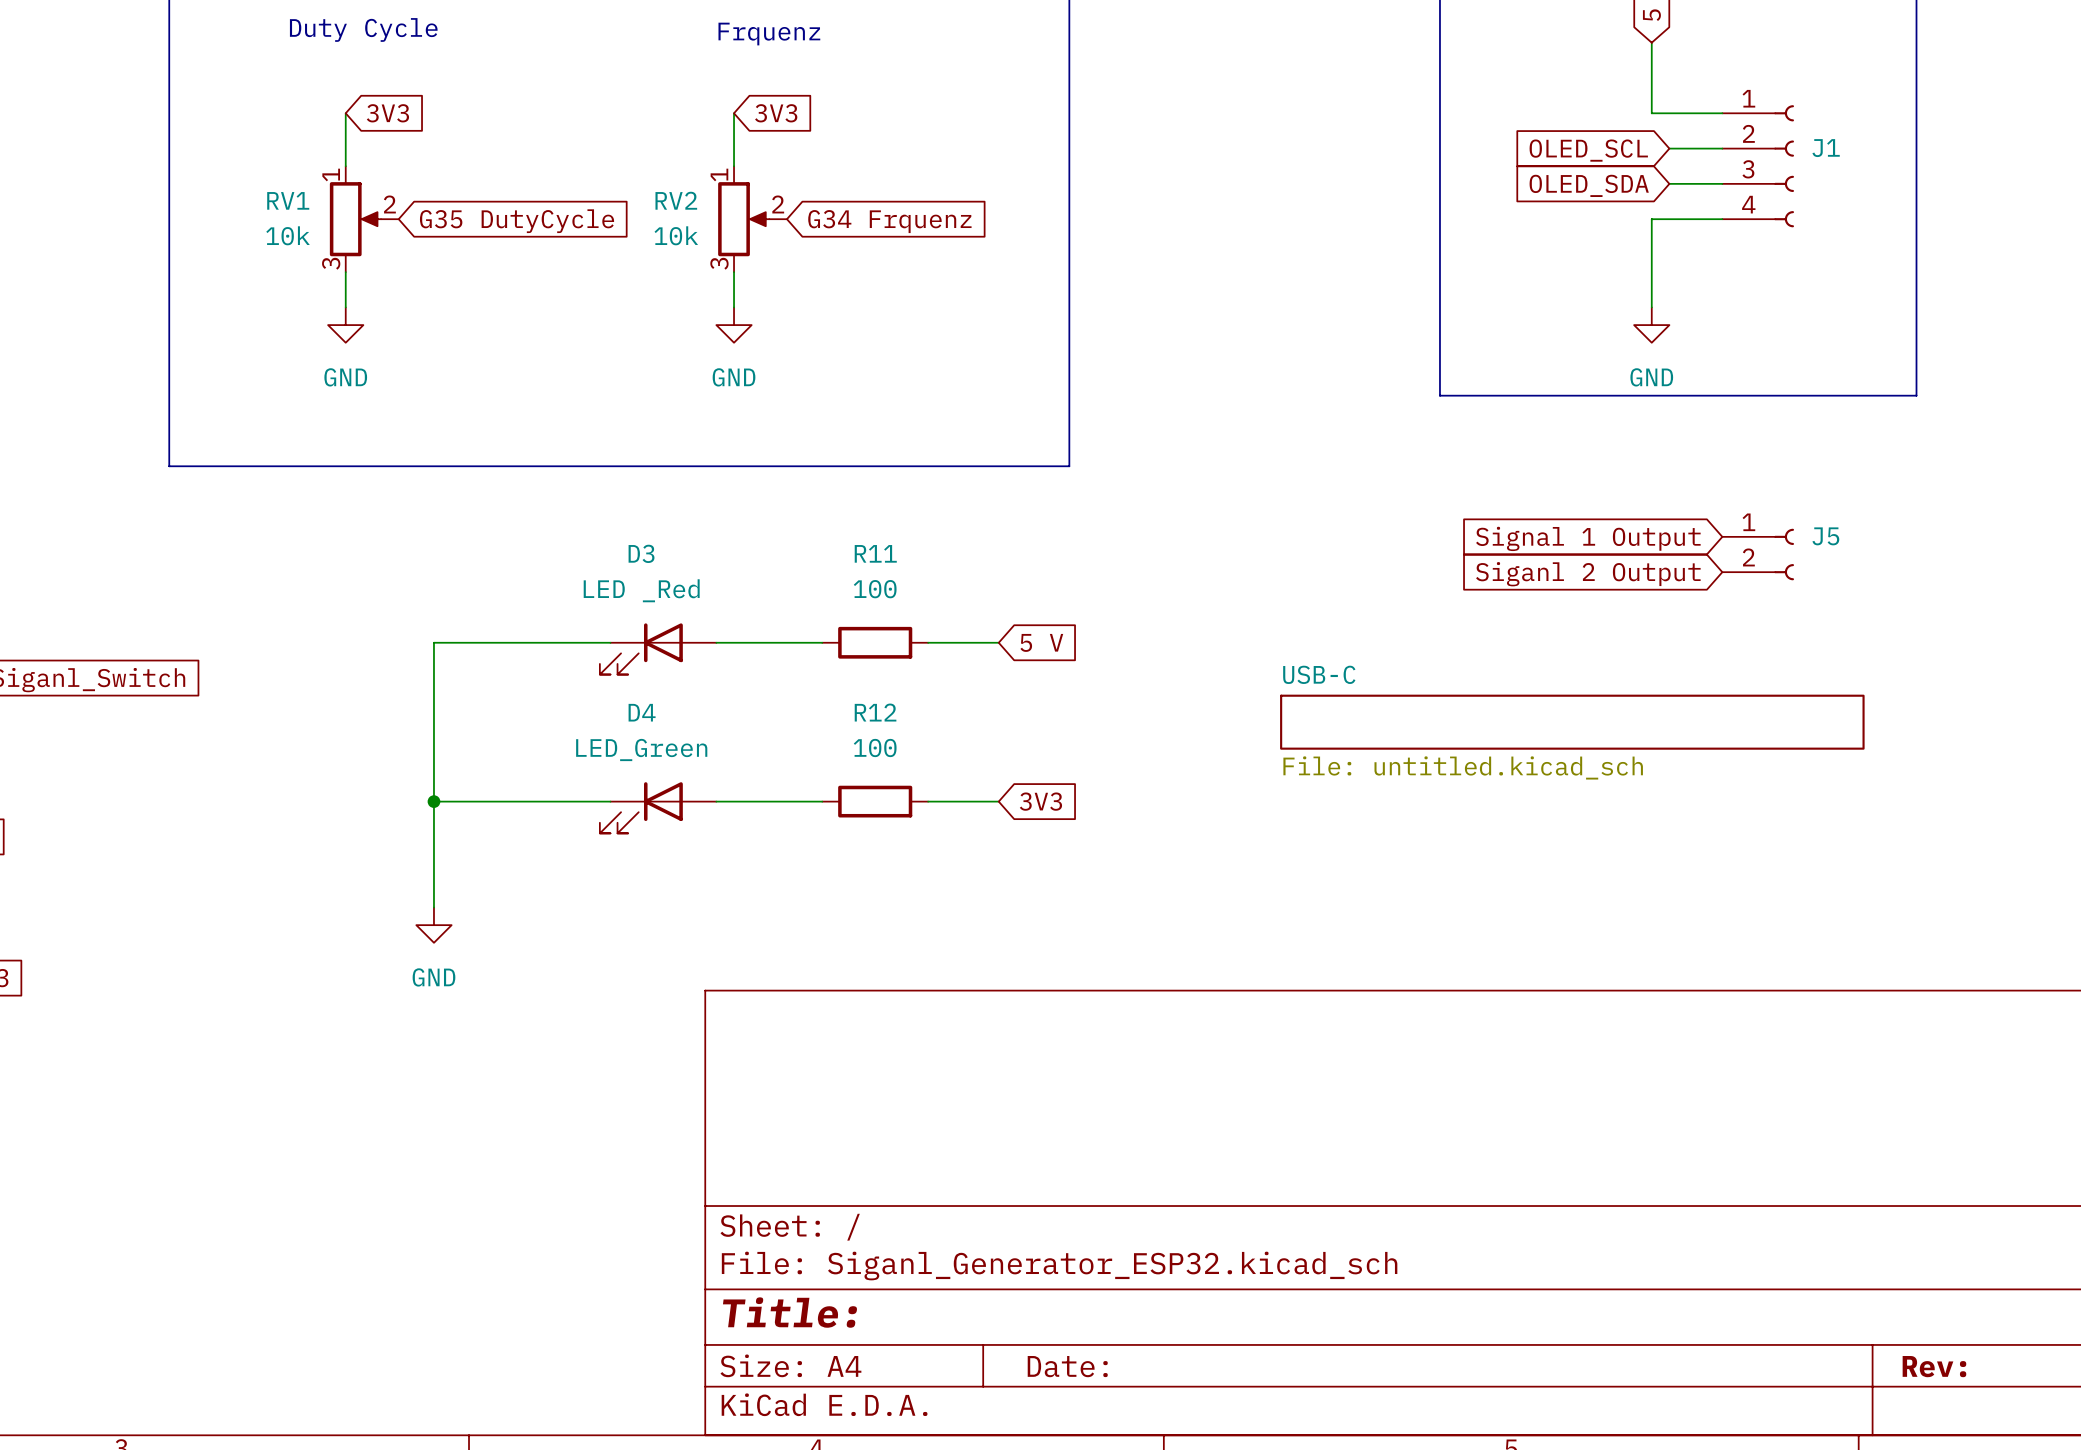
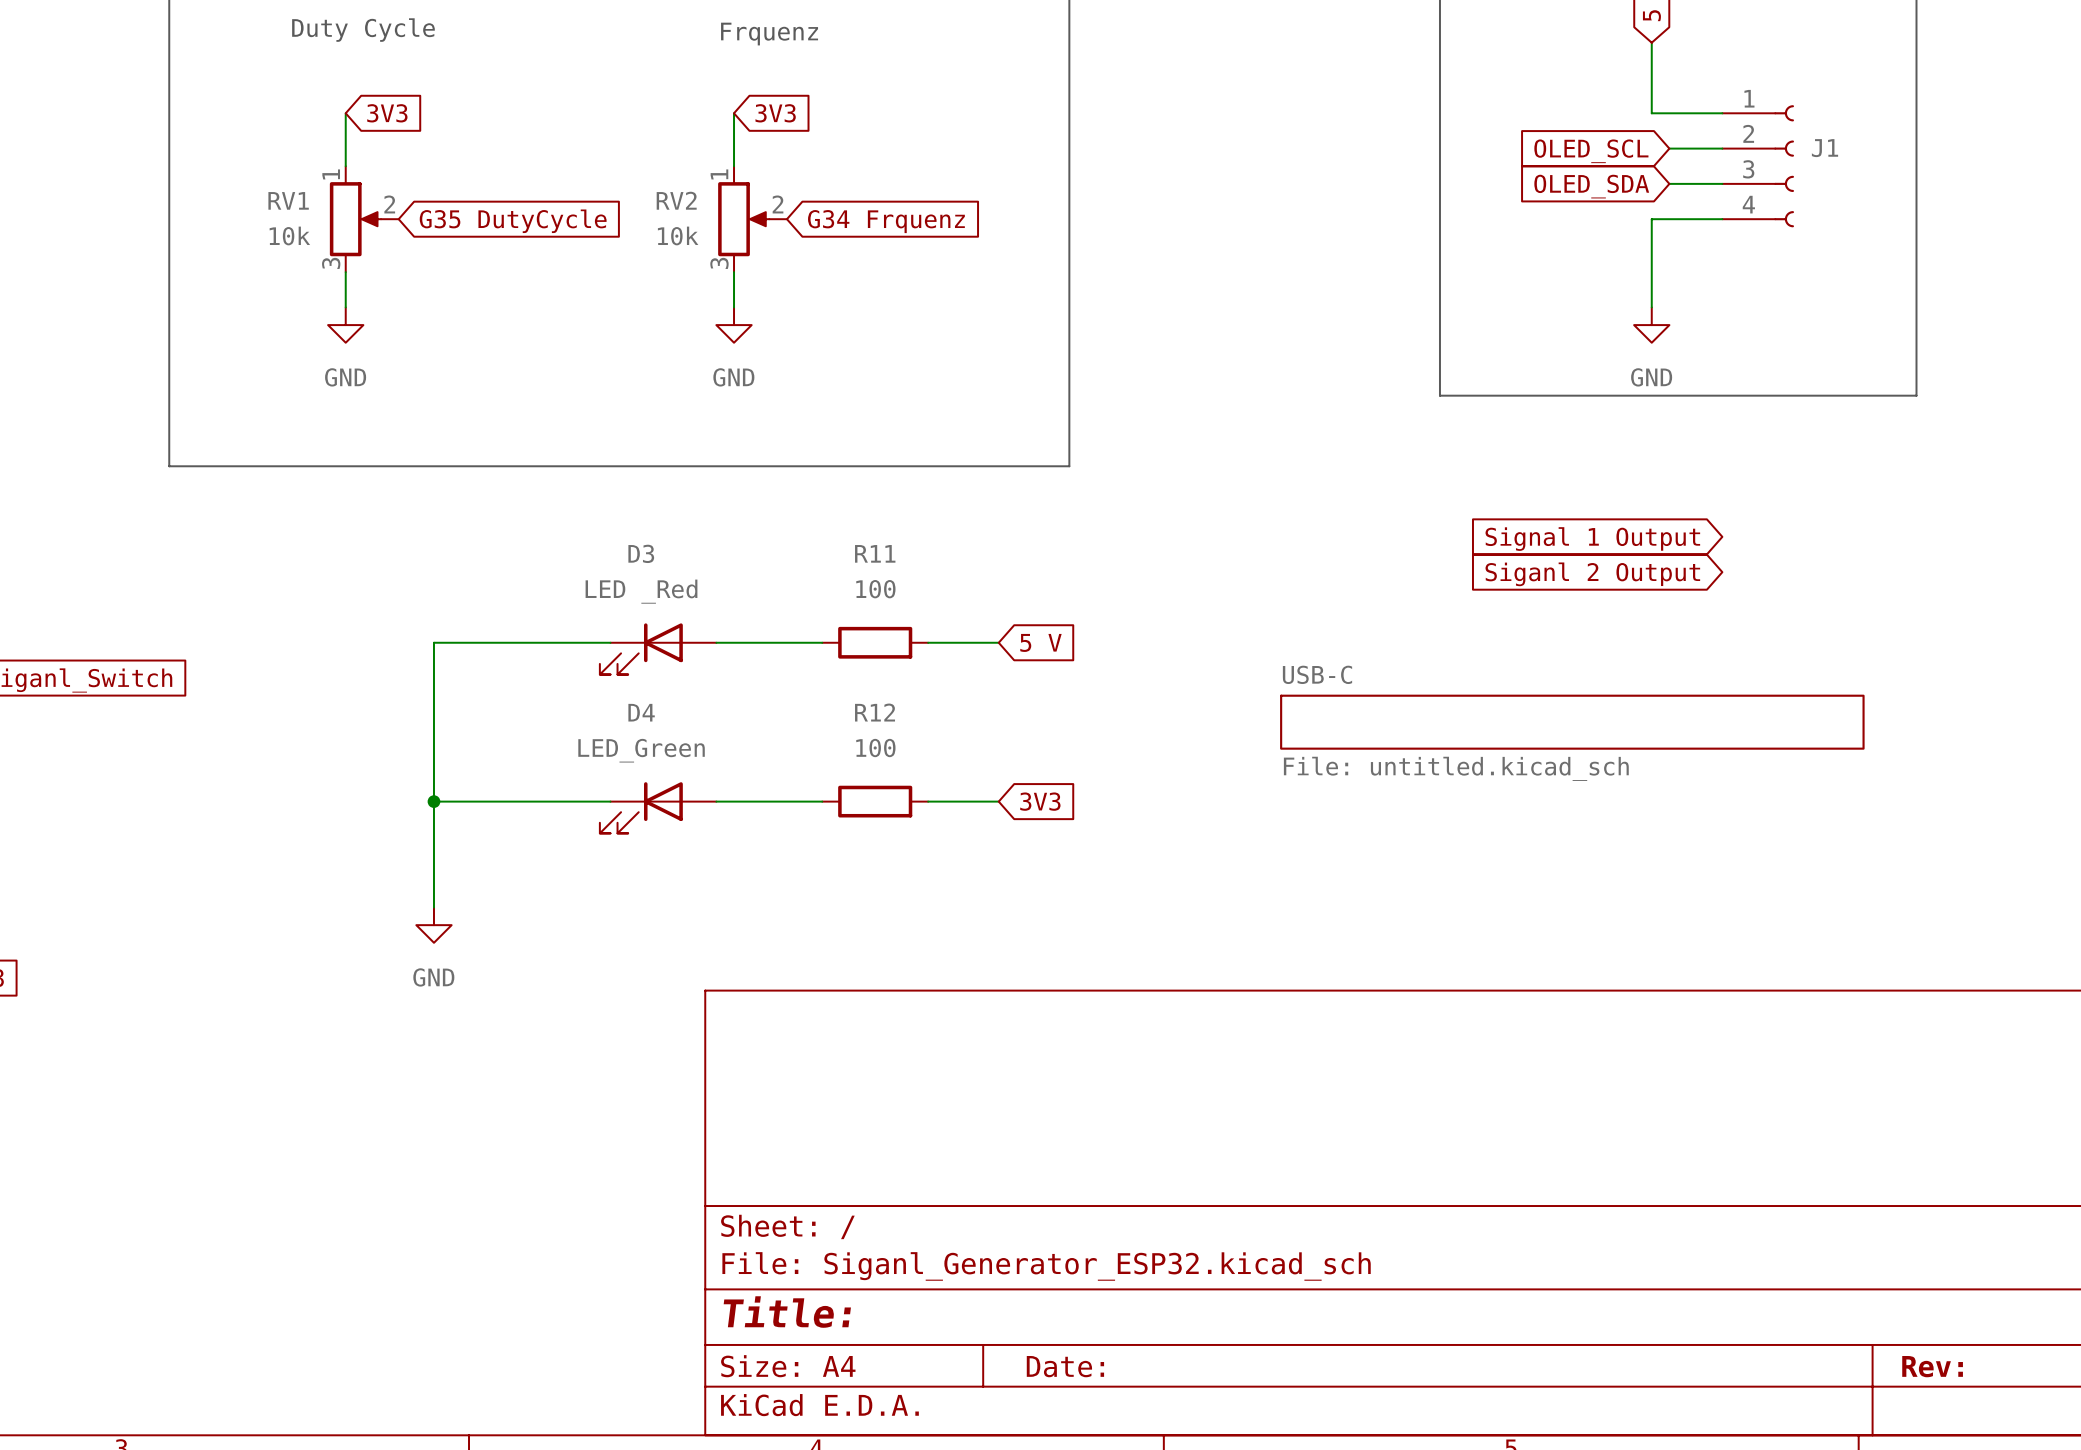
J5: (1758, 554) -> none

